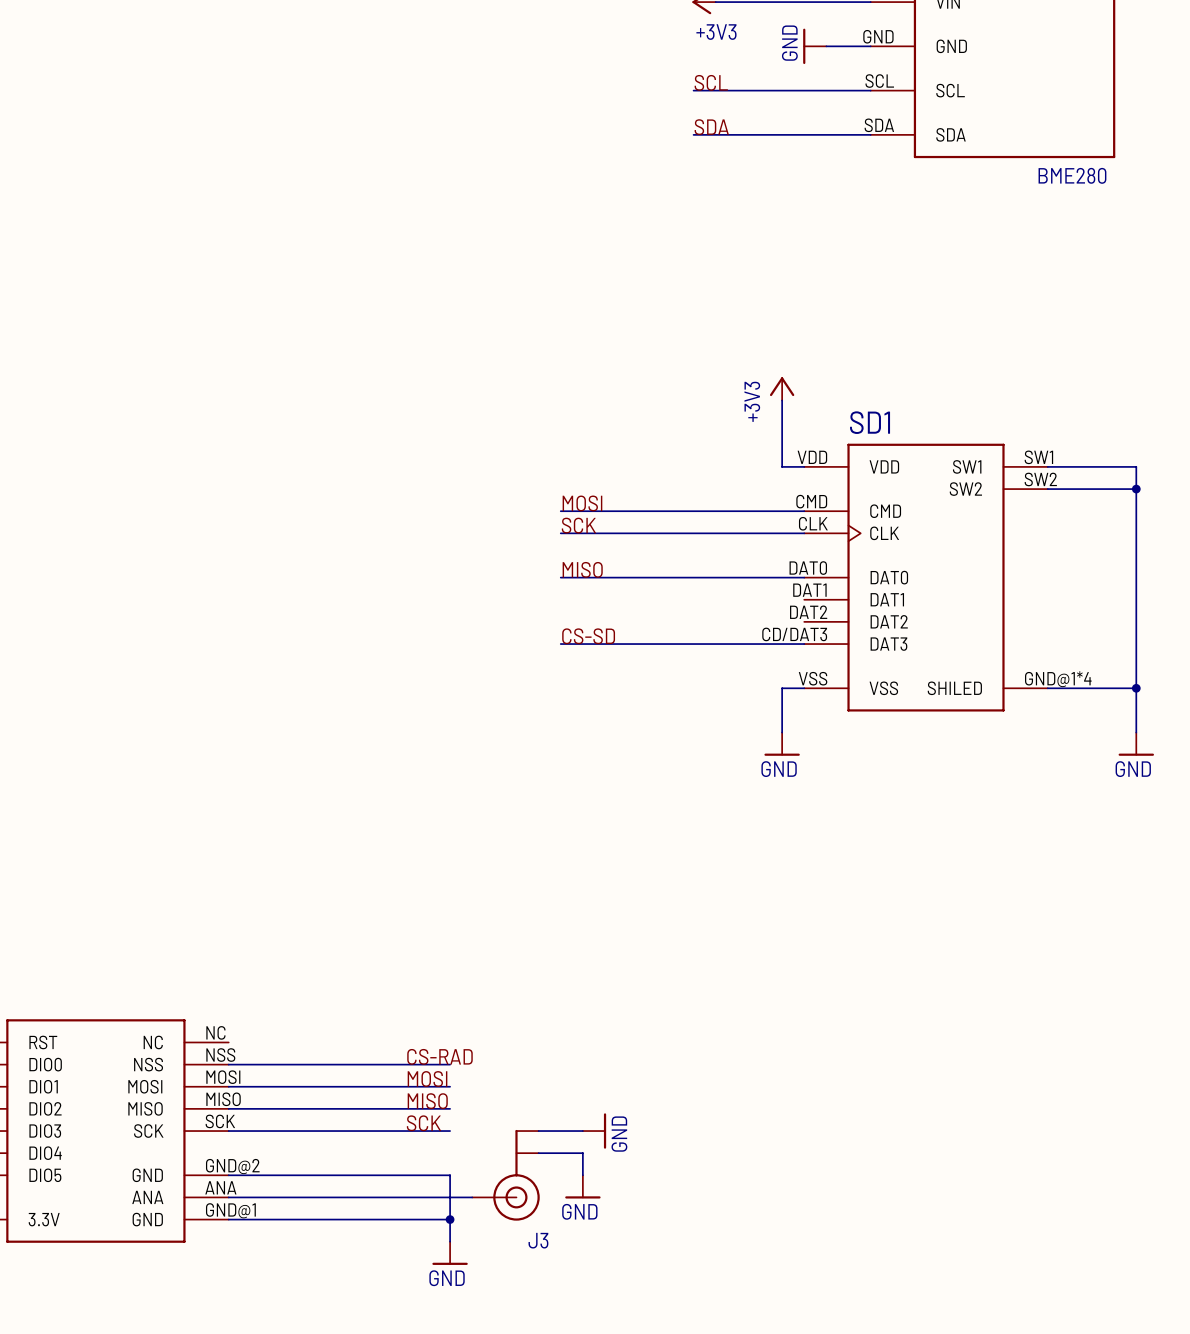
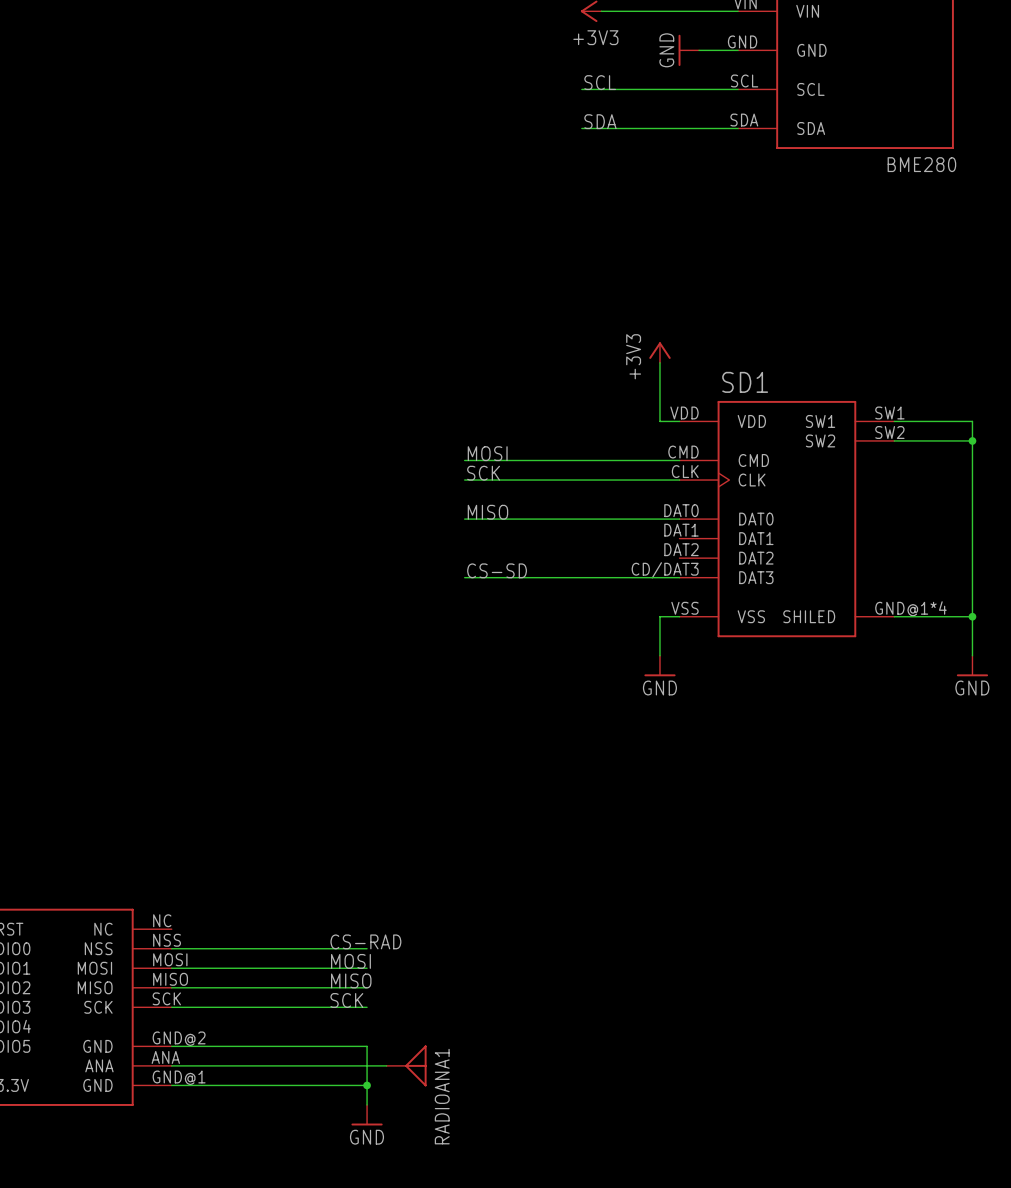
wire: (538, 1131) (582, 1131) -> none
power symbol: GND (594, 1131) -> none
wire: (538, 1153) (582, 1153) (582, 1175) -> none
J3: (505, 1175) -> none
power symbol: GND (582, 1186) -> none
RADIOANA1: none -> (406, 1065)

